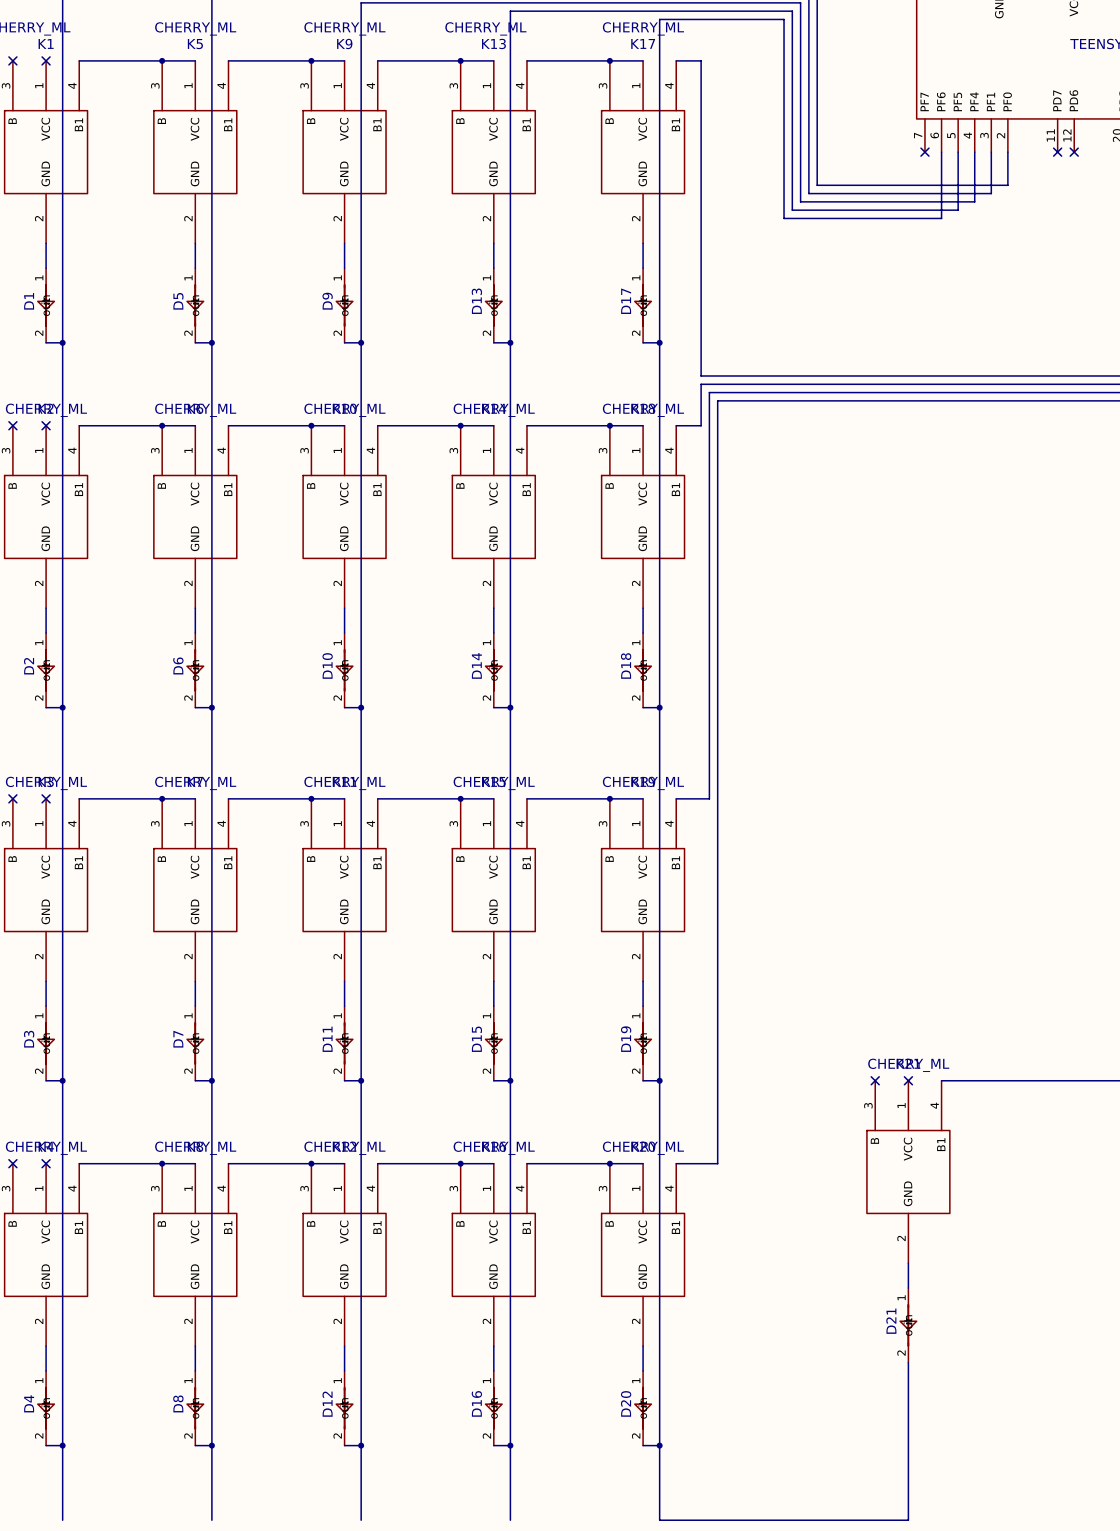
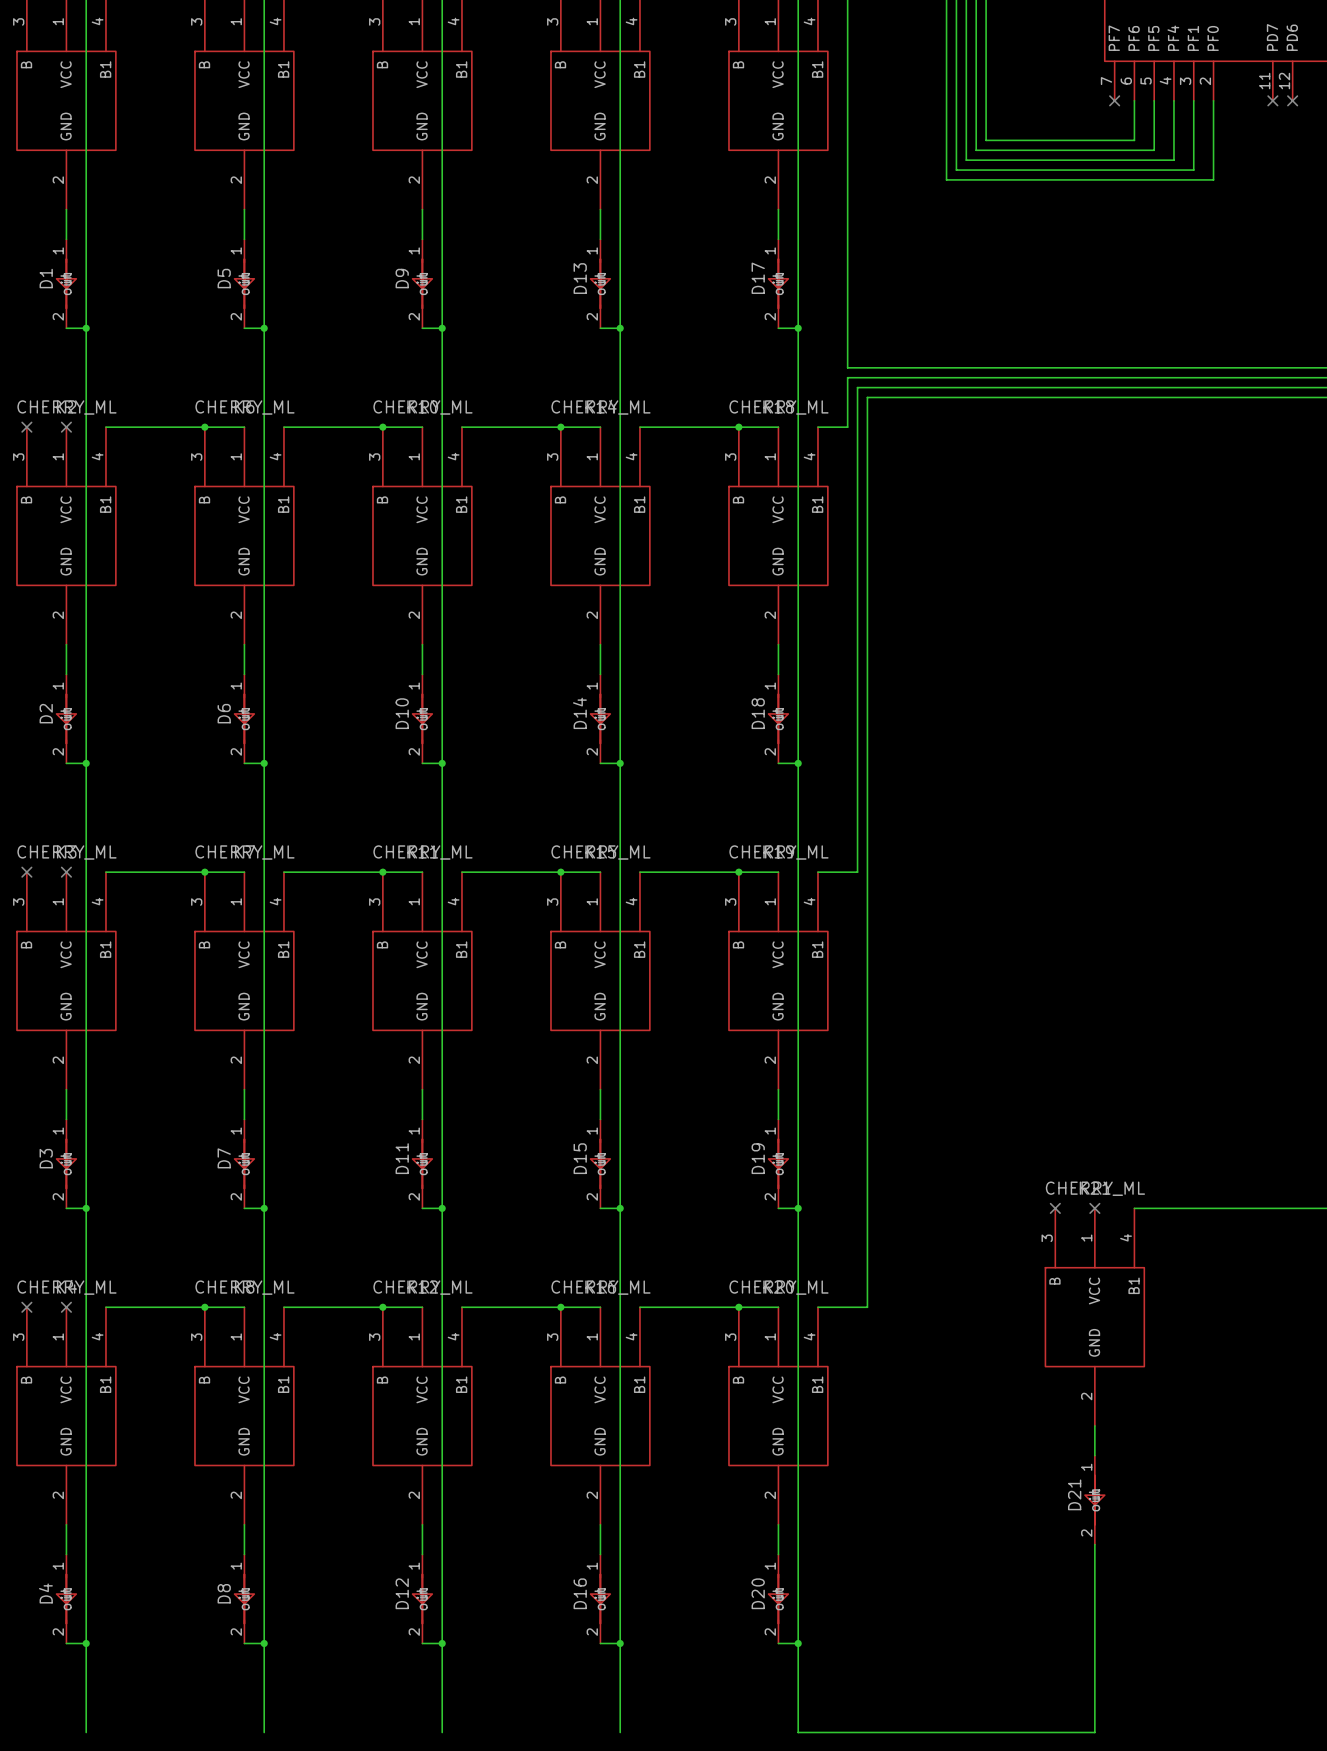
wire: (1007, 185) (941, 185) (941, 218) -> (1213, 140) (1213, 179) (1134, 179)
wire: (991, 193) (958, 193) (958, 210) -> (1193, 150) (1193, 170) (1154, 170)

